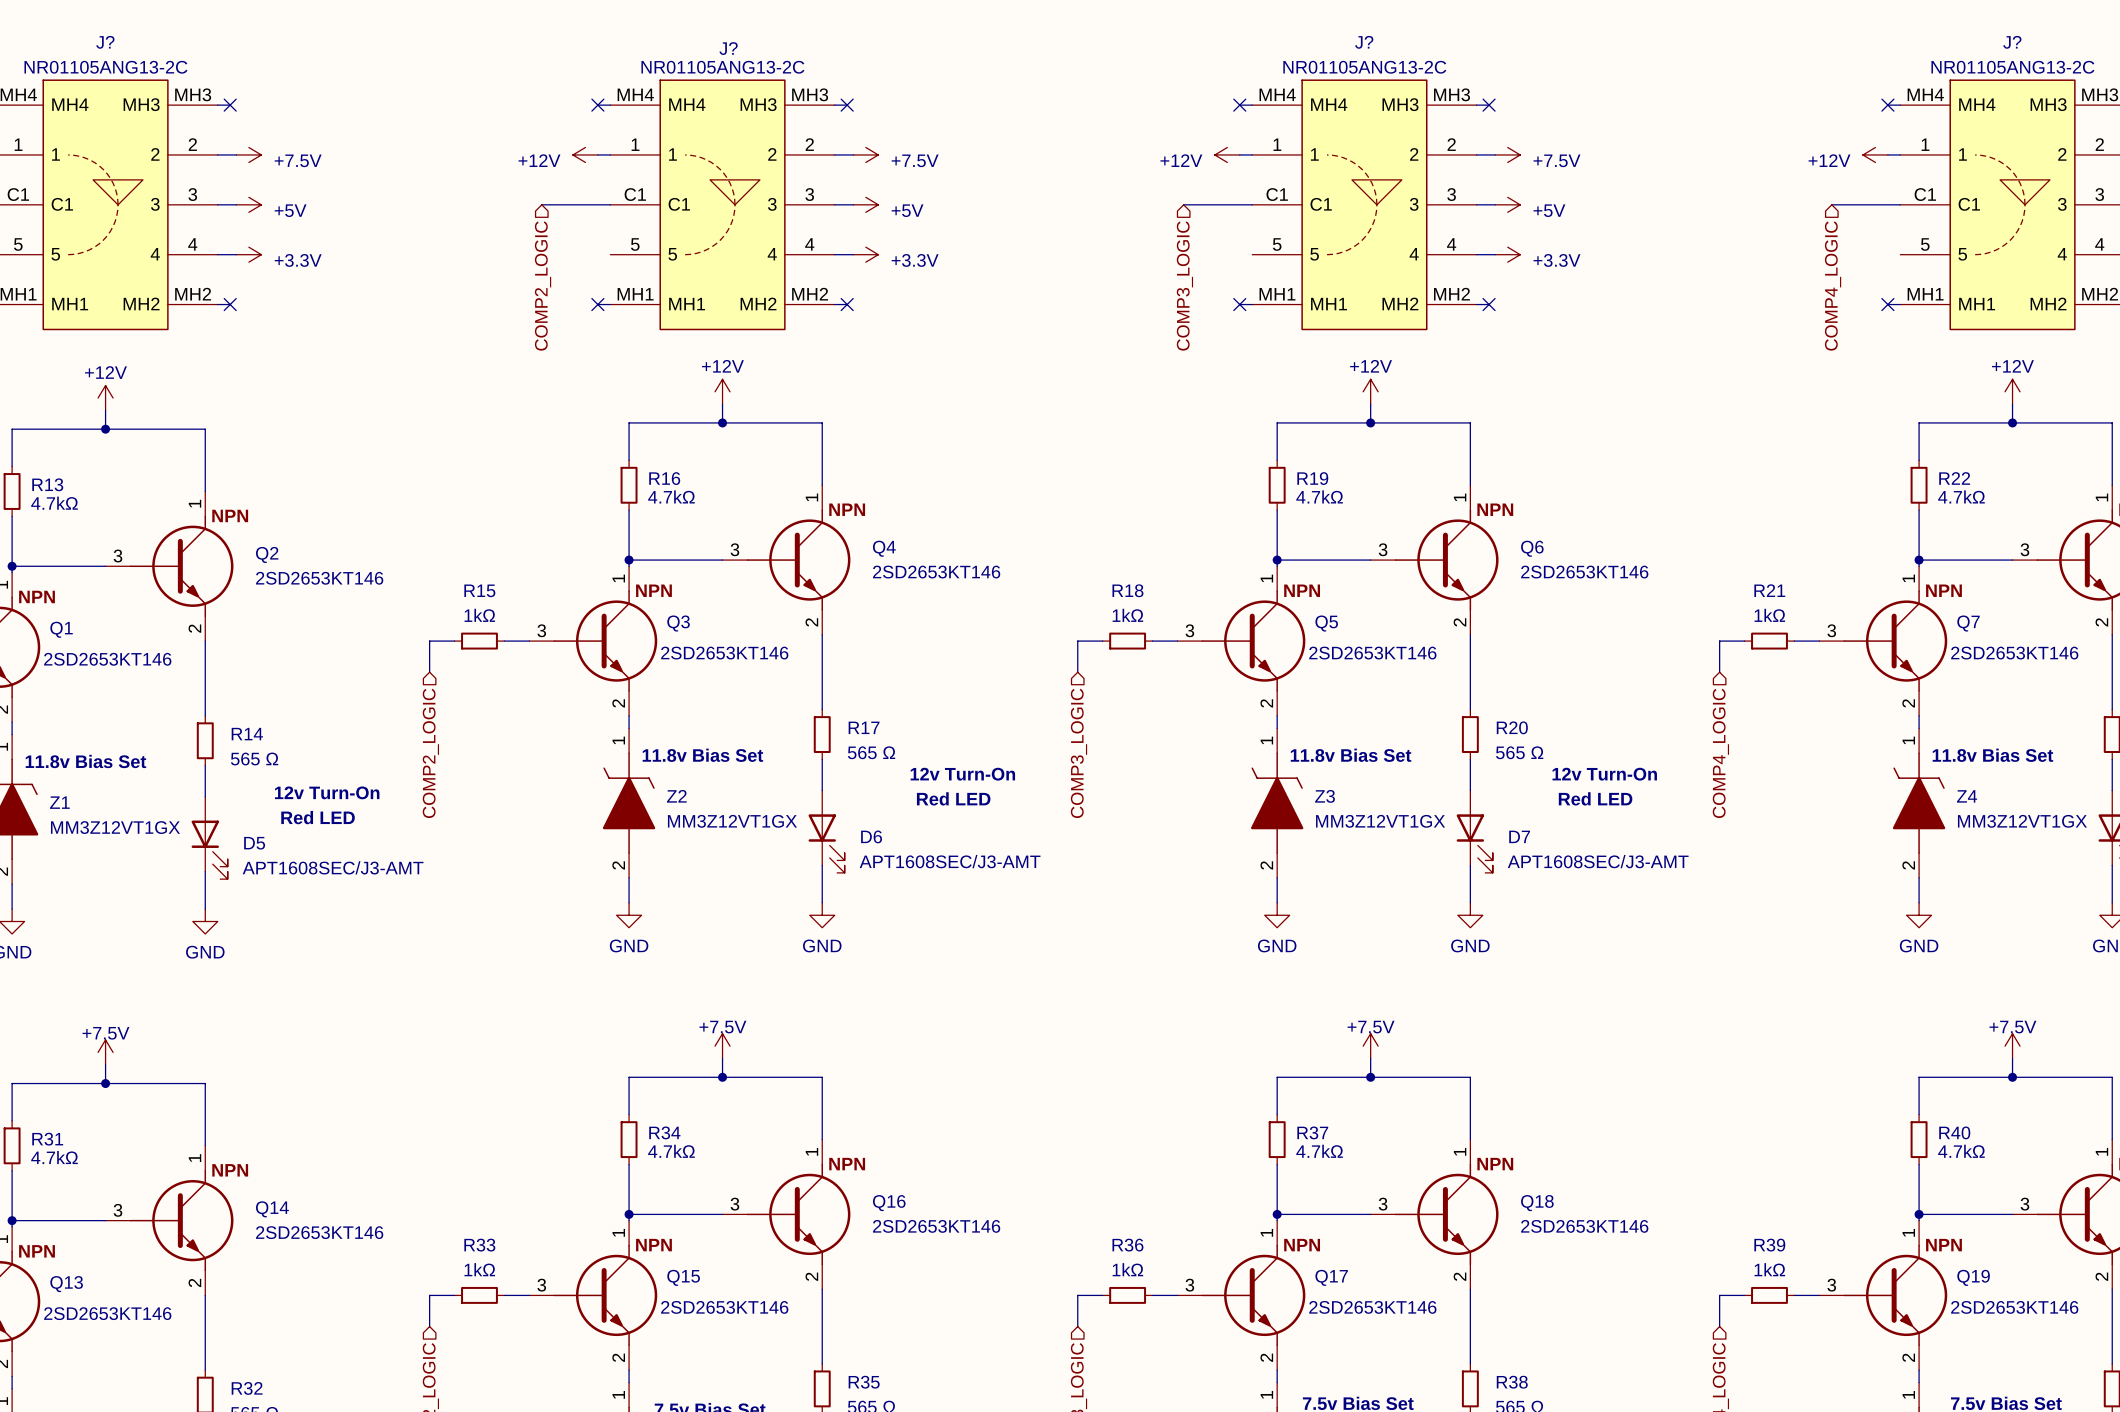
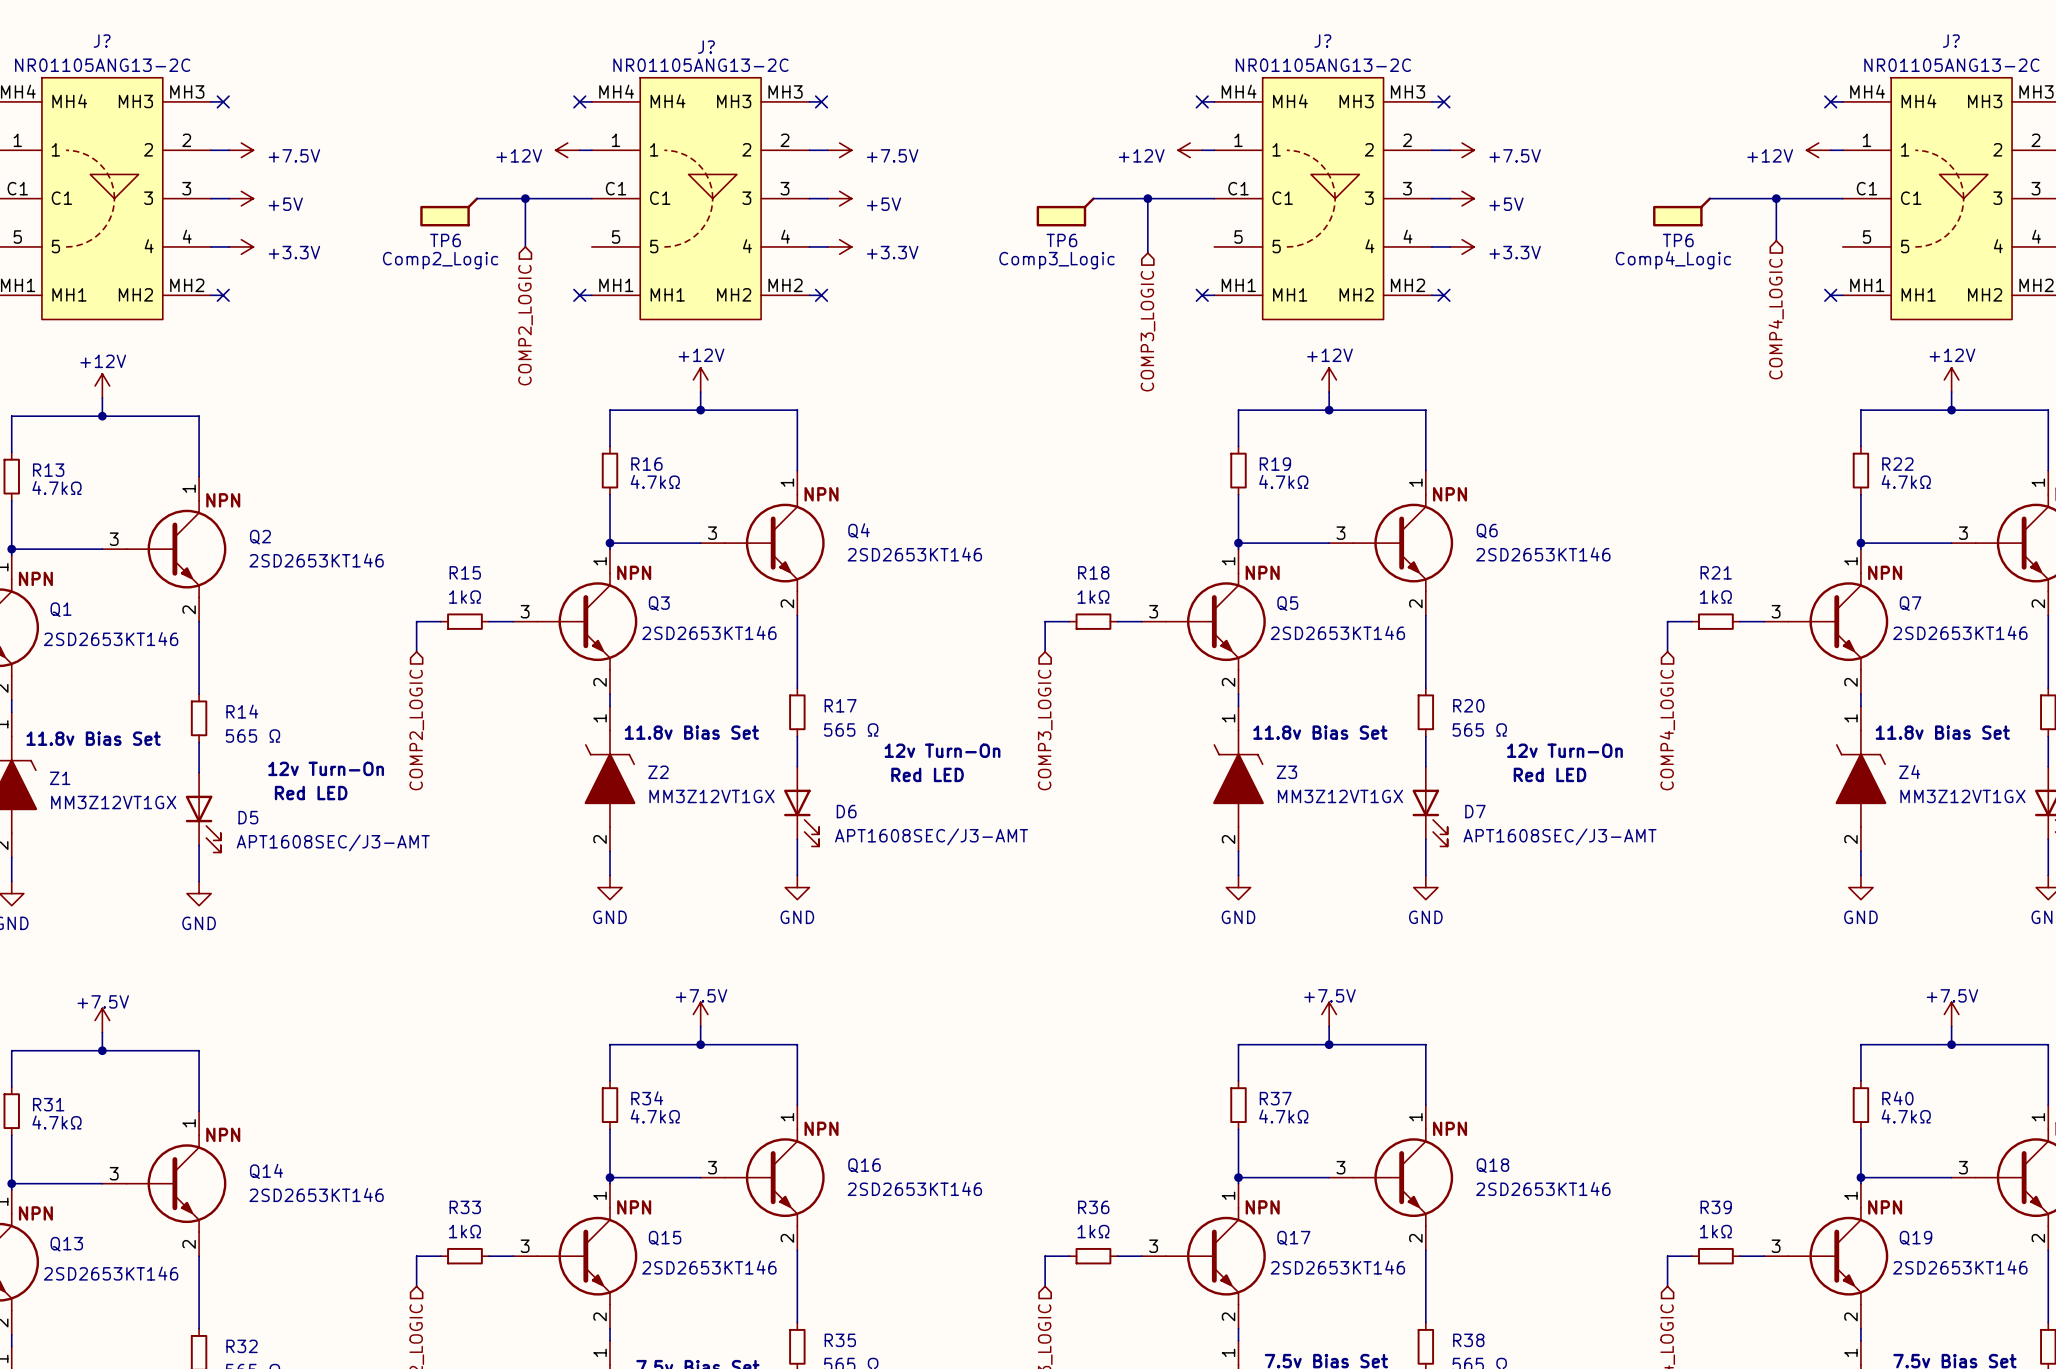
wire: none -> (477, 198) (525, 198) (525, 246)
junction: none -> (525, 198)
wire: none -> (1093, 198) (1147, 198) (1147, 253)
junction: none -> (1147, 198)
wire: none -> (1709, 198) (1776, 198) (1776, 240)
junction: none -> (1776, 198)
TP6: none -> Comp2_Logic (449, 211)
TP6: none -> Comp3_Logic (1065, 211)
TP6: none -> Comp4_Logic (1682, 211)
hierarchical label position: COMP2_LOGIC (543, 285) -> COMP2_LOGIC (525, 325)
hierarchical label position: COMP3_LOGIC (1184, 285) -> COMP3_LOGIC (1147, 331)
hierarchical label position: COMP4_LOGIC (1833, 285) -> COMP4_LOGIC (1776, 319)

